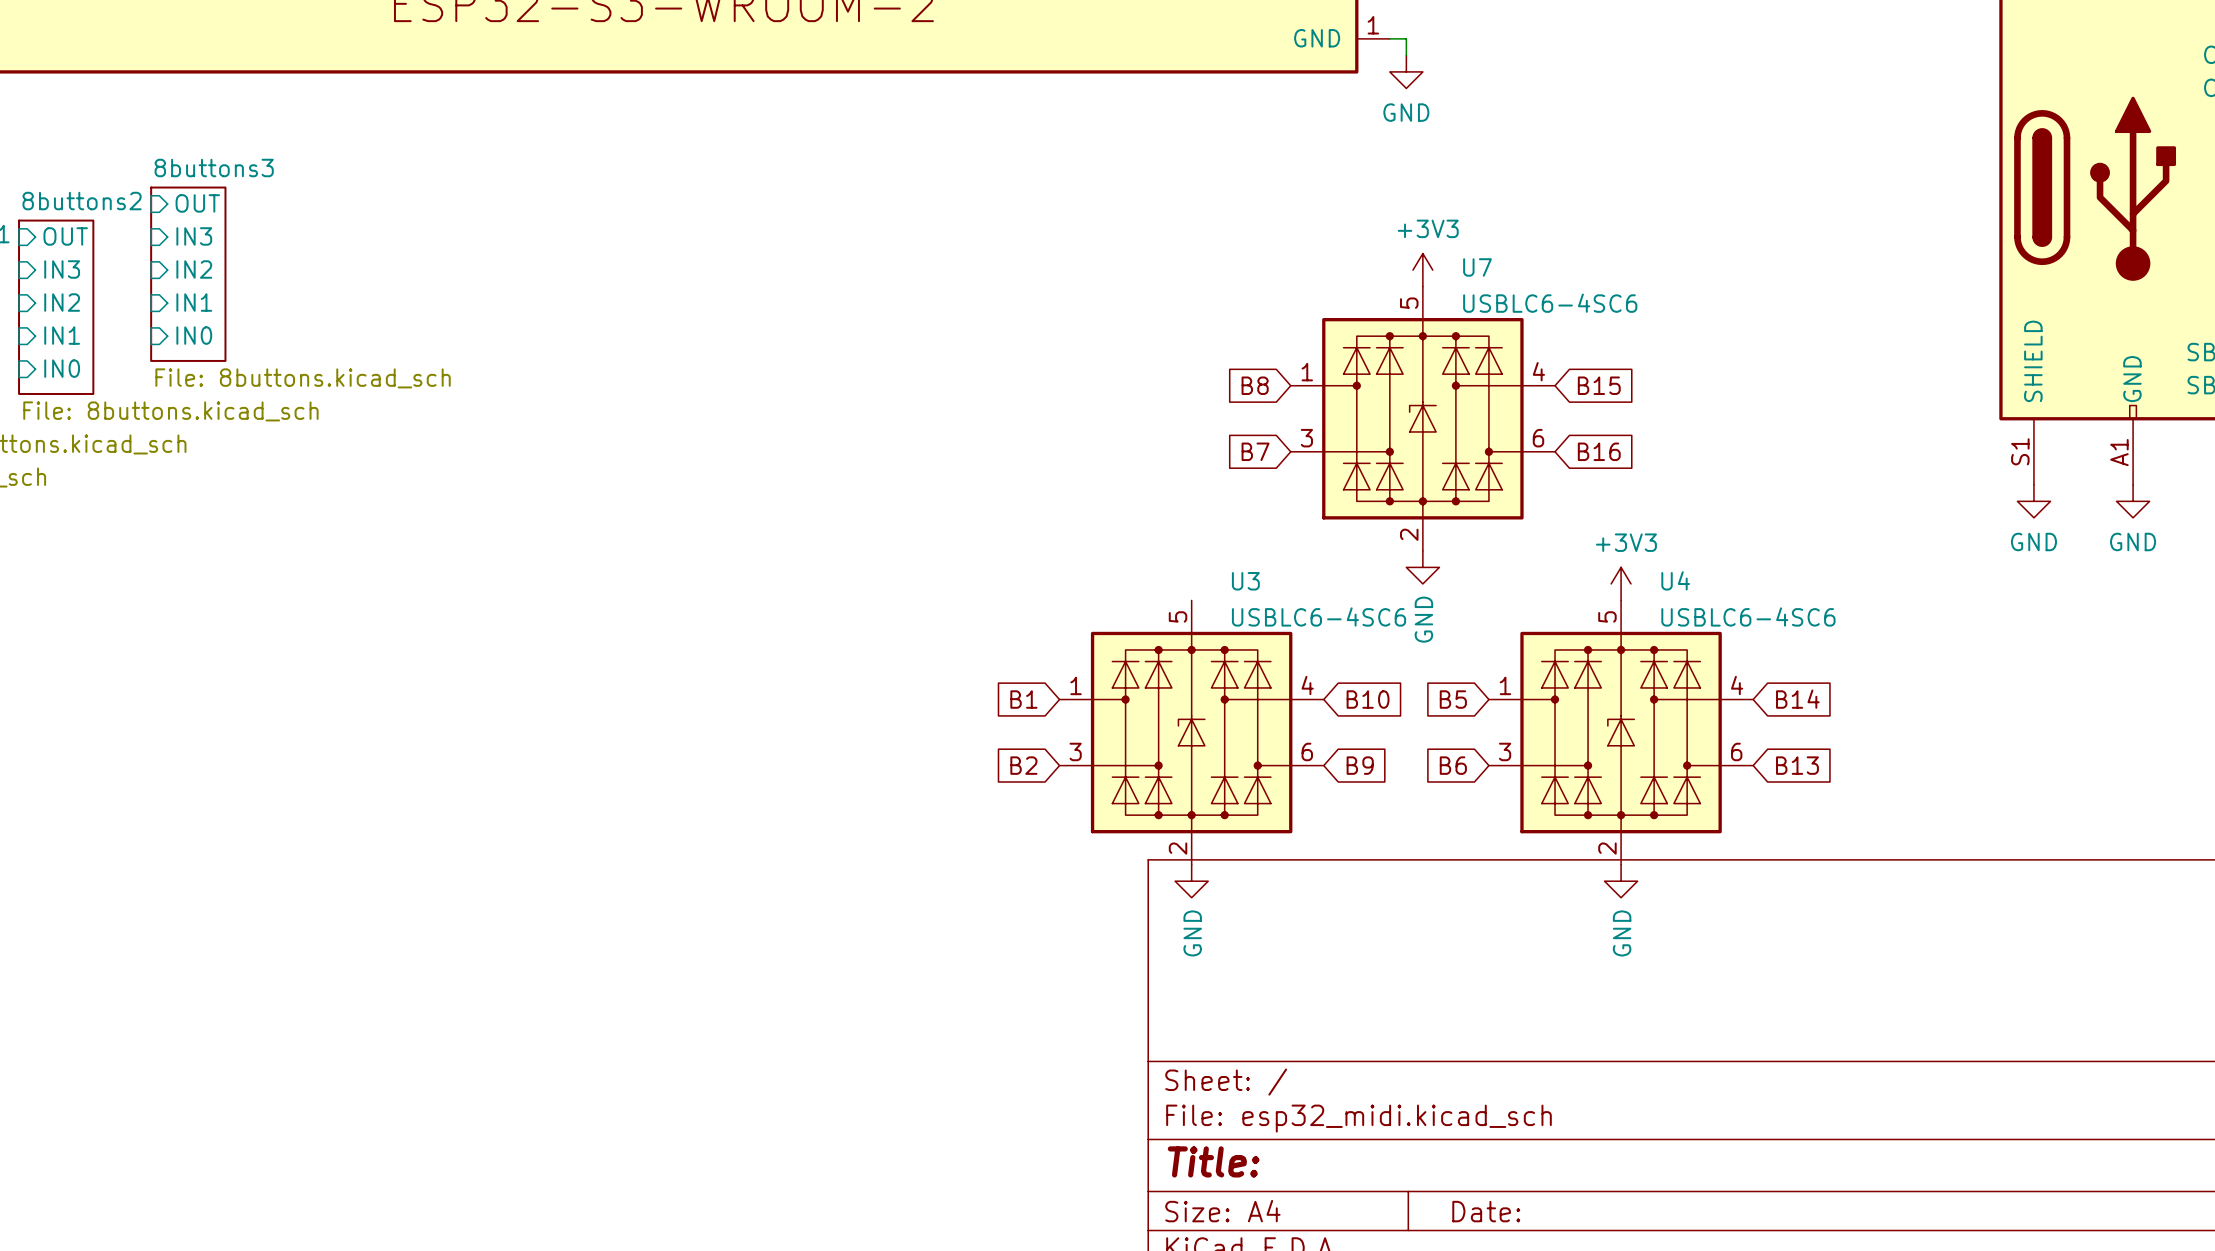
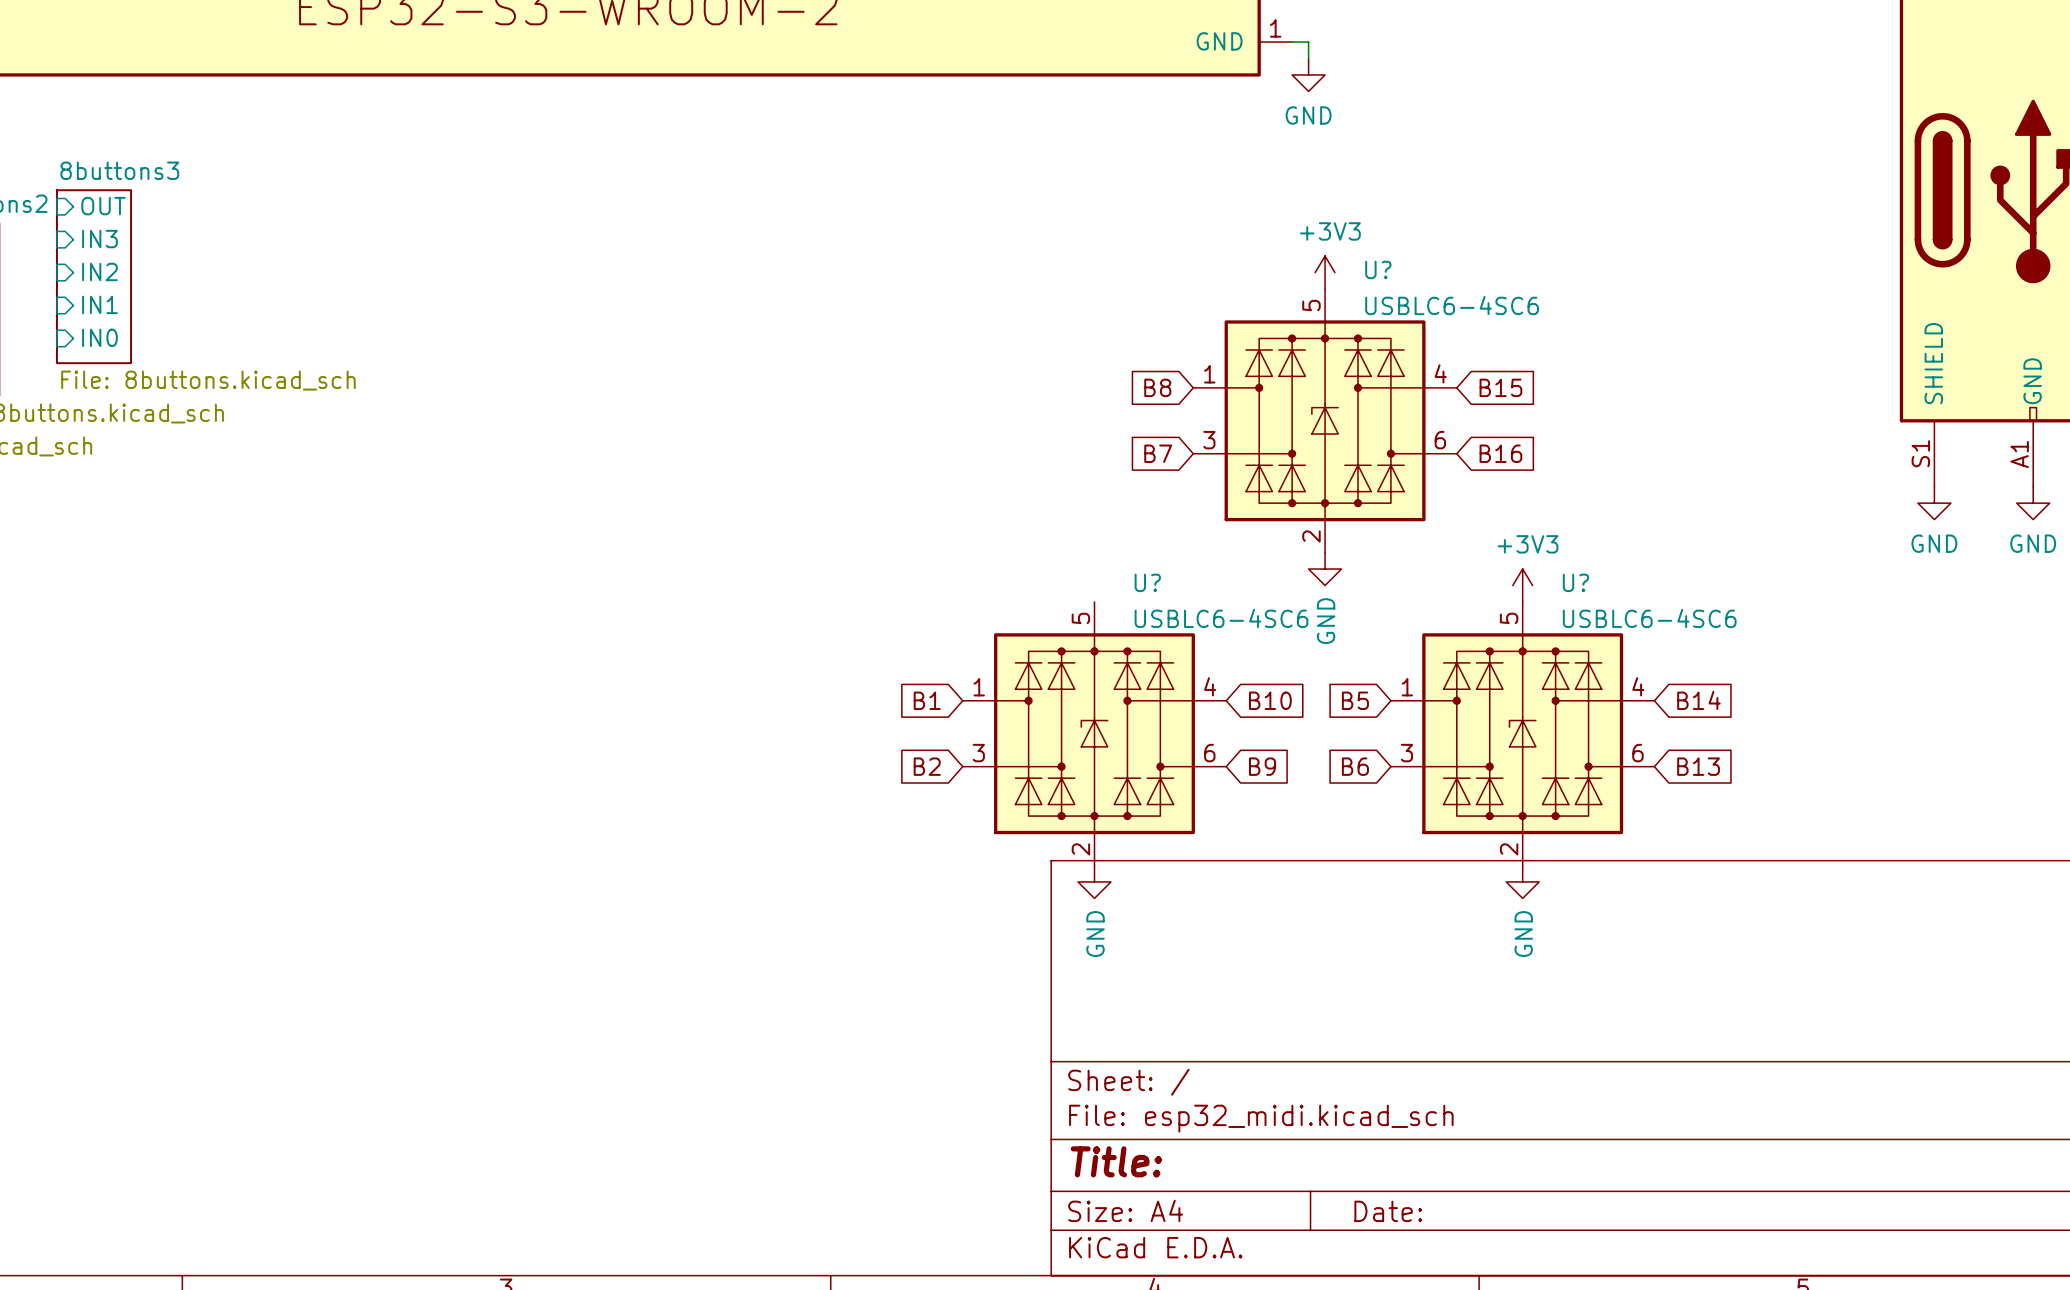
U7 name: U7 (1477, 267) -> U? (1378, 269)
U4 name: U4 (1675, 580) -> U? (1575, 582)
U3 name: U3 (1245, 581) -> U? (1147, 582)

